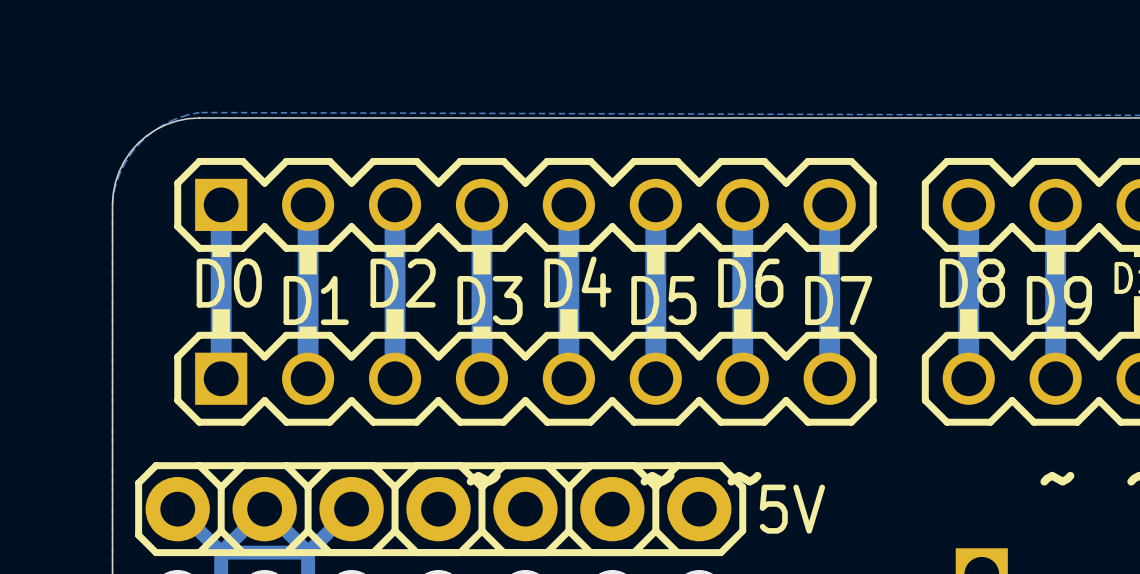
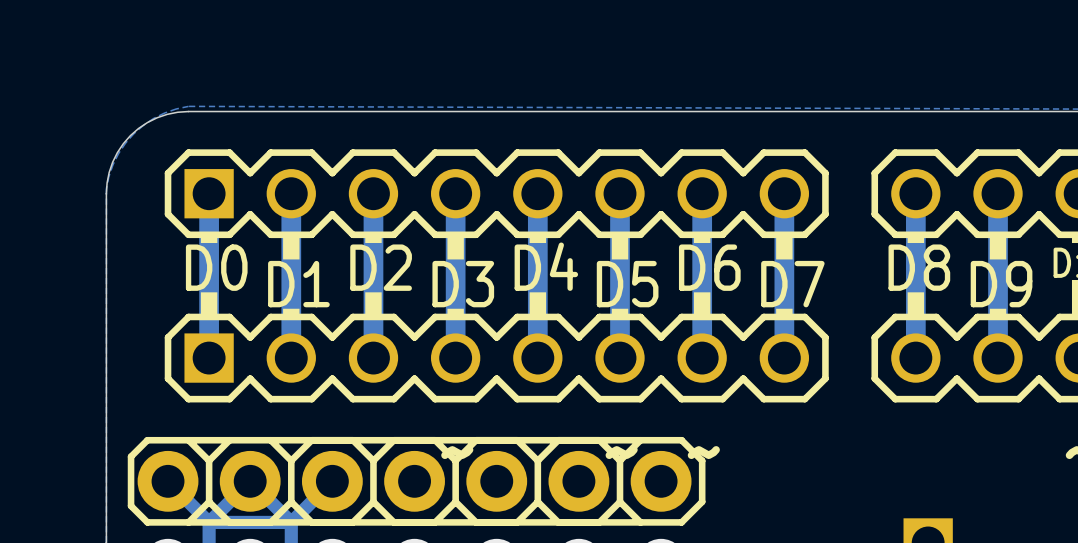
text: ~ (1057, 478) -> none
text: 5V (792, 509) -> none

